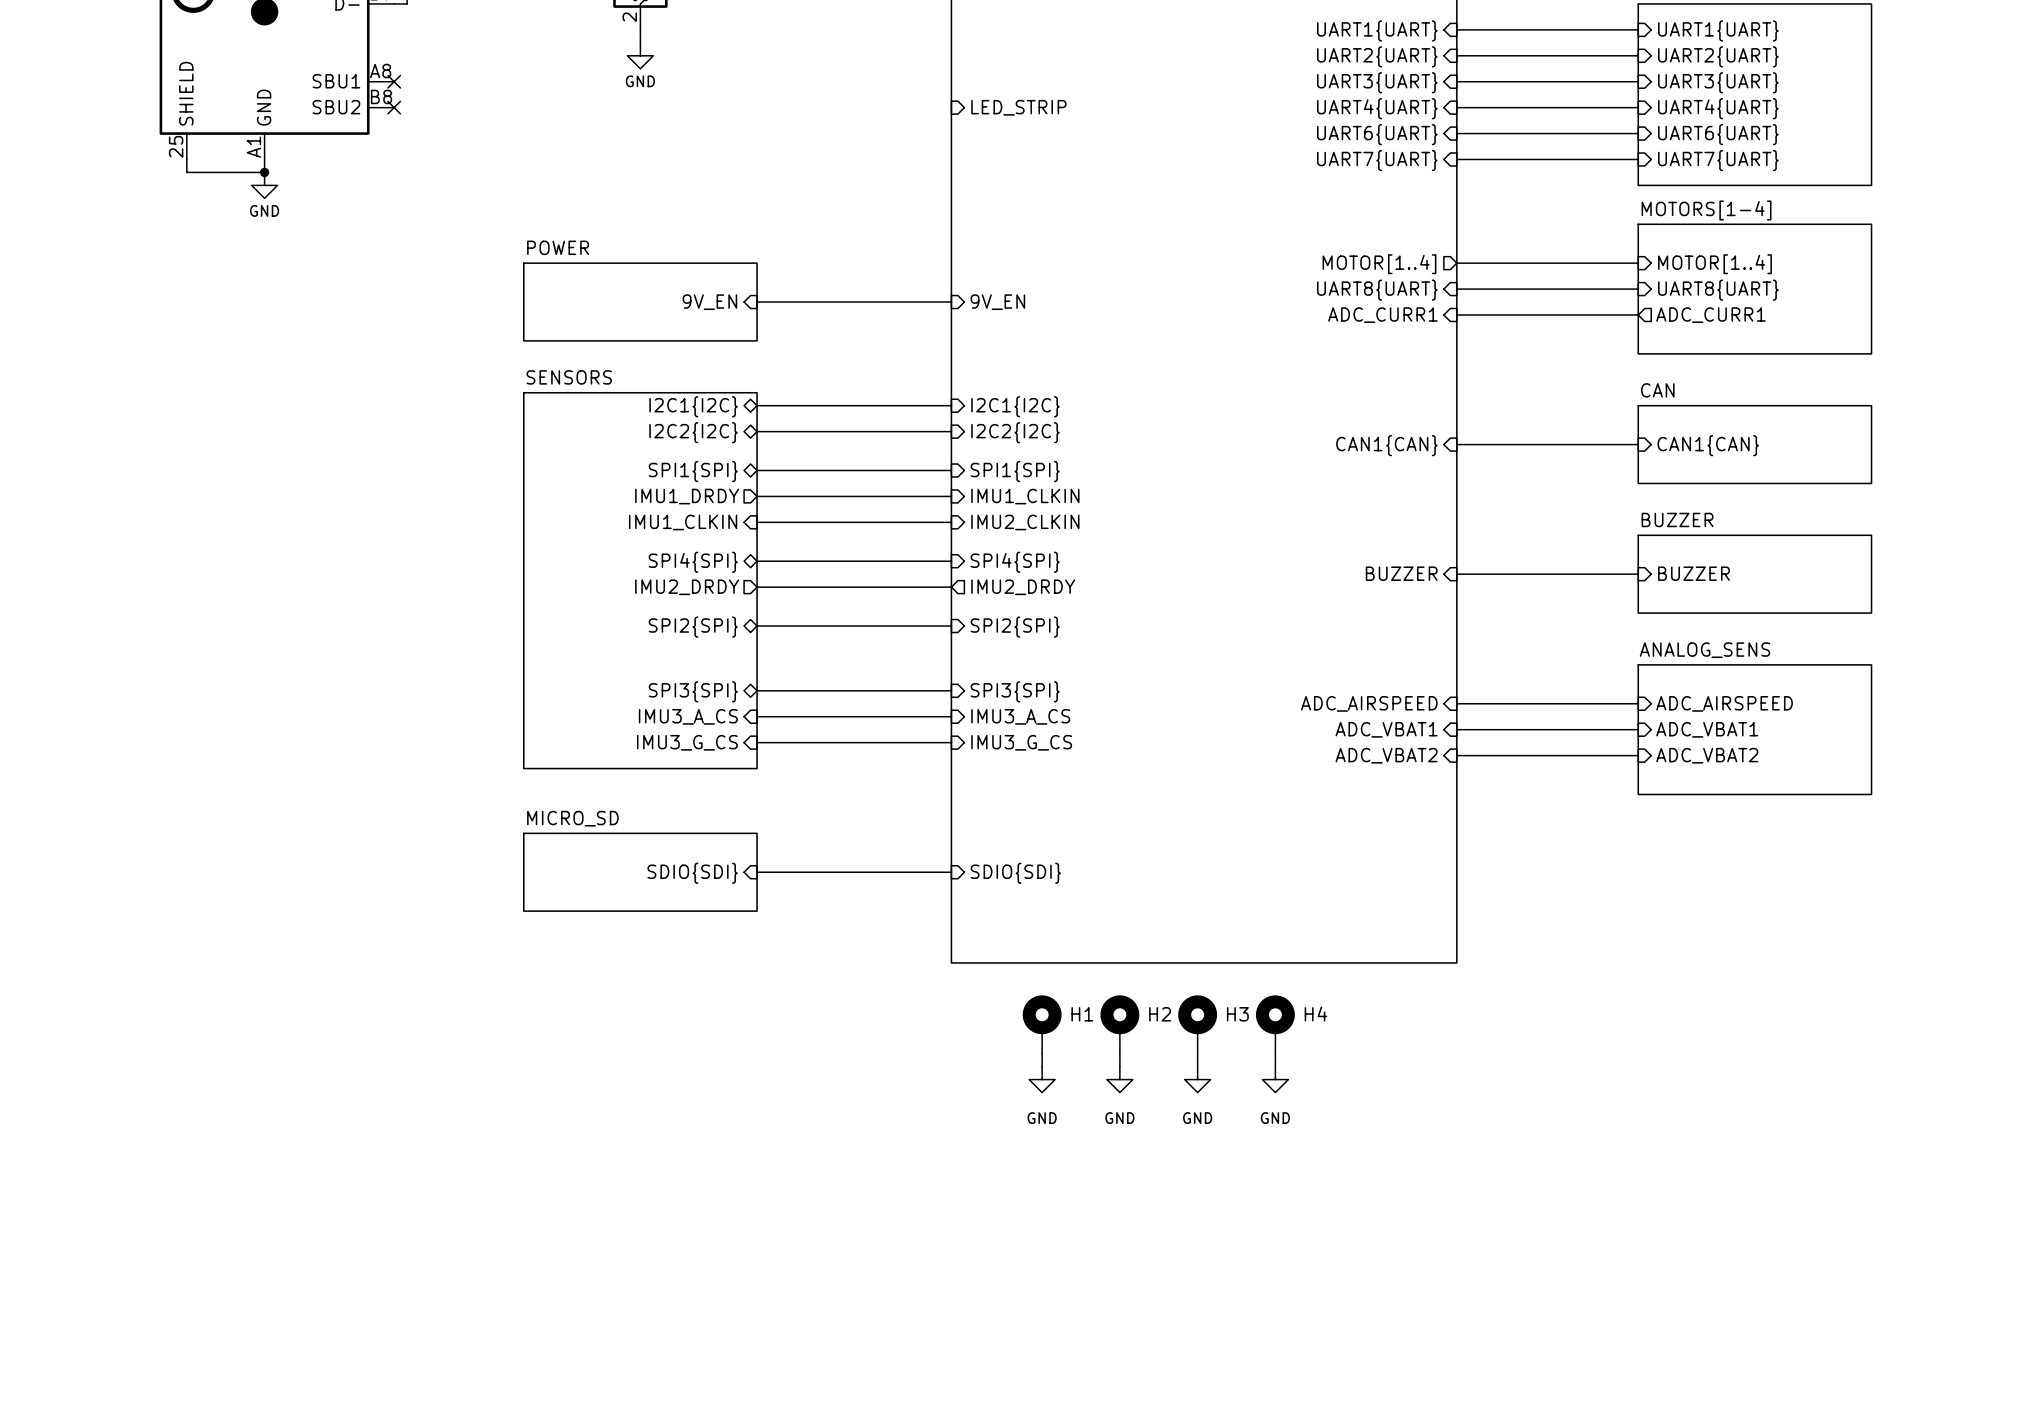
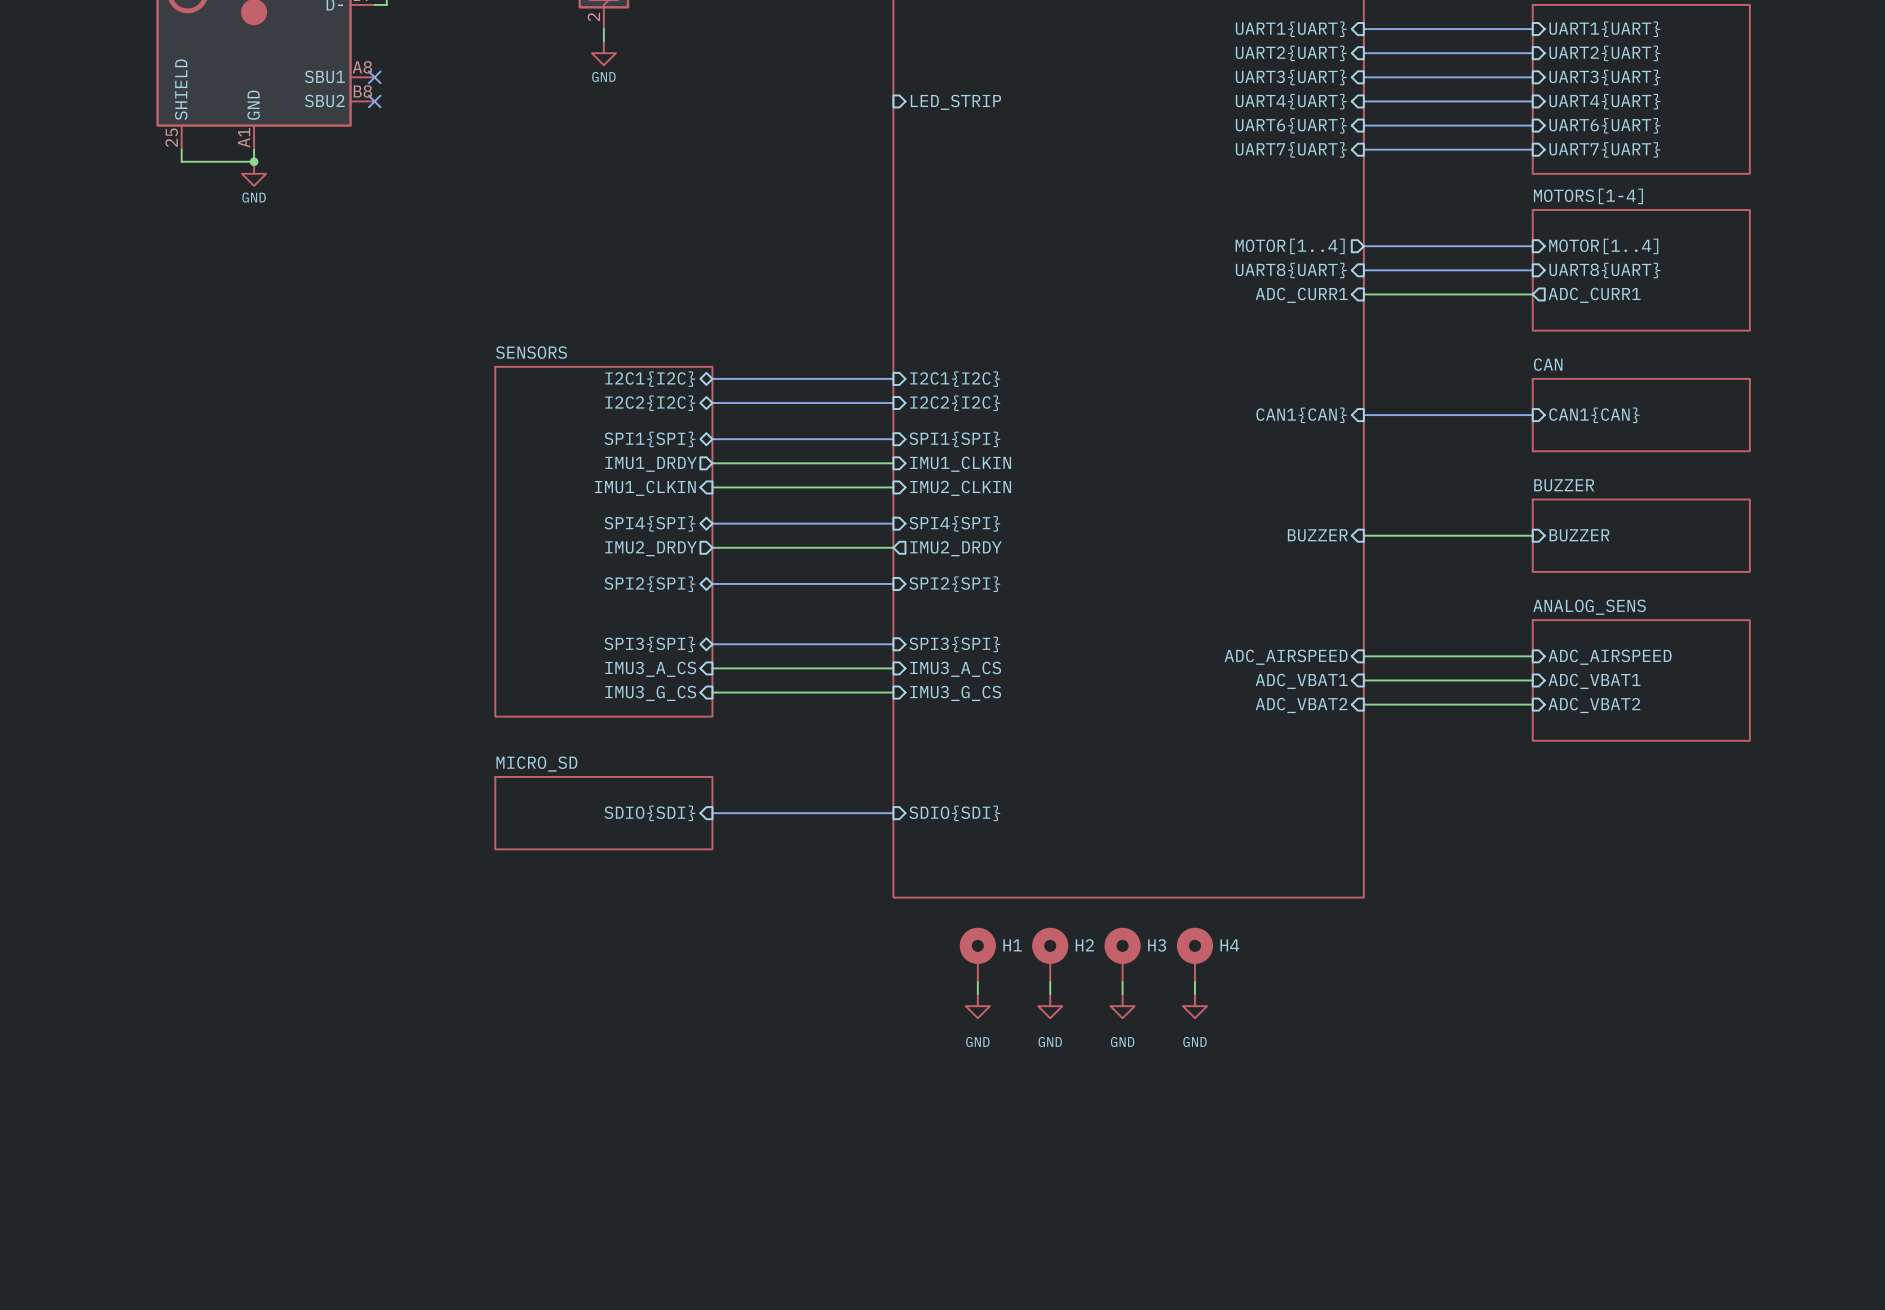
sheet POWER: (640, 302) -> none
sheet pin: 9V_EN (709, 302) -> none
wire: (757, 302) (951, 302) -> none
sheet pin: 9V_EN (997, 302) -> none

